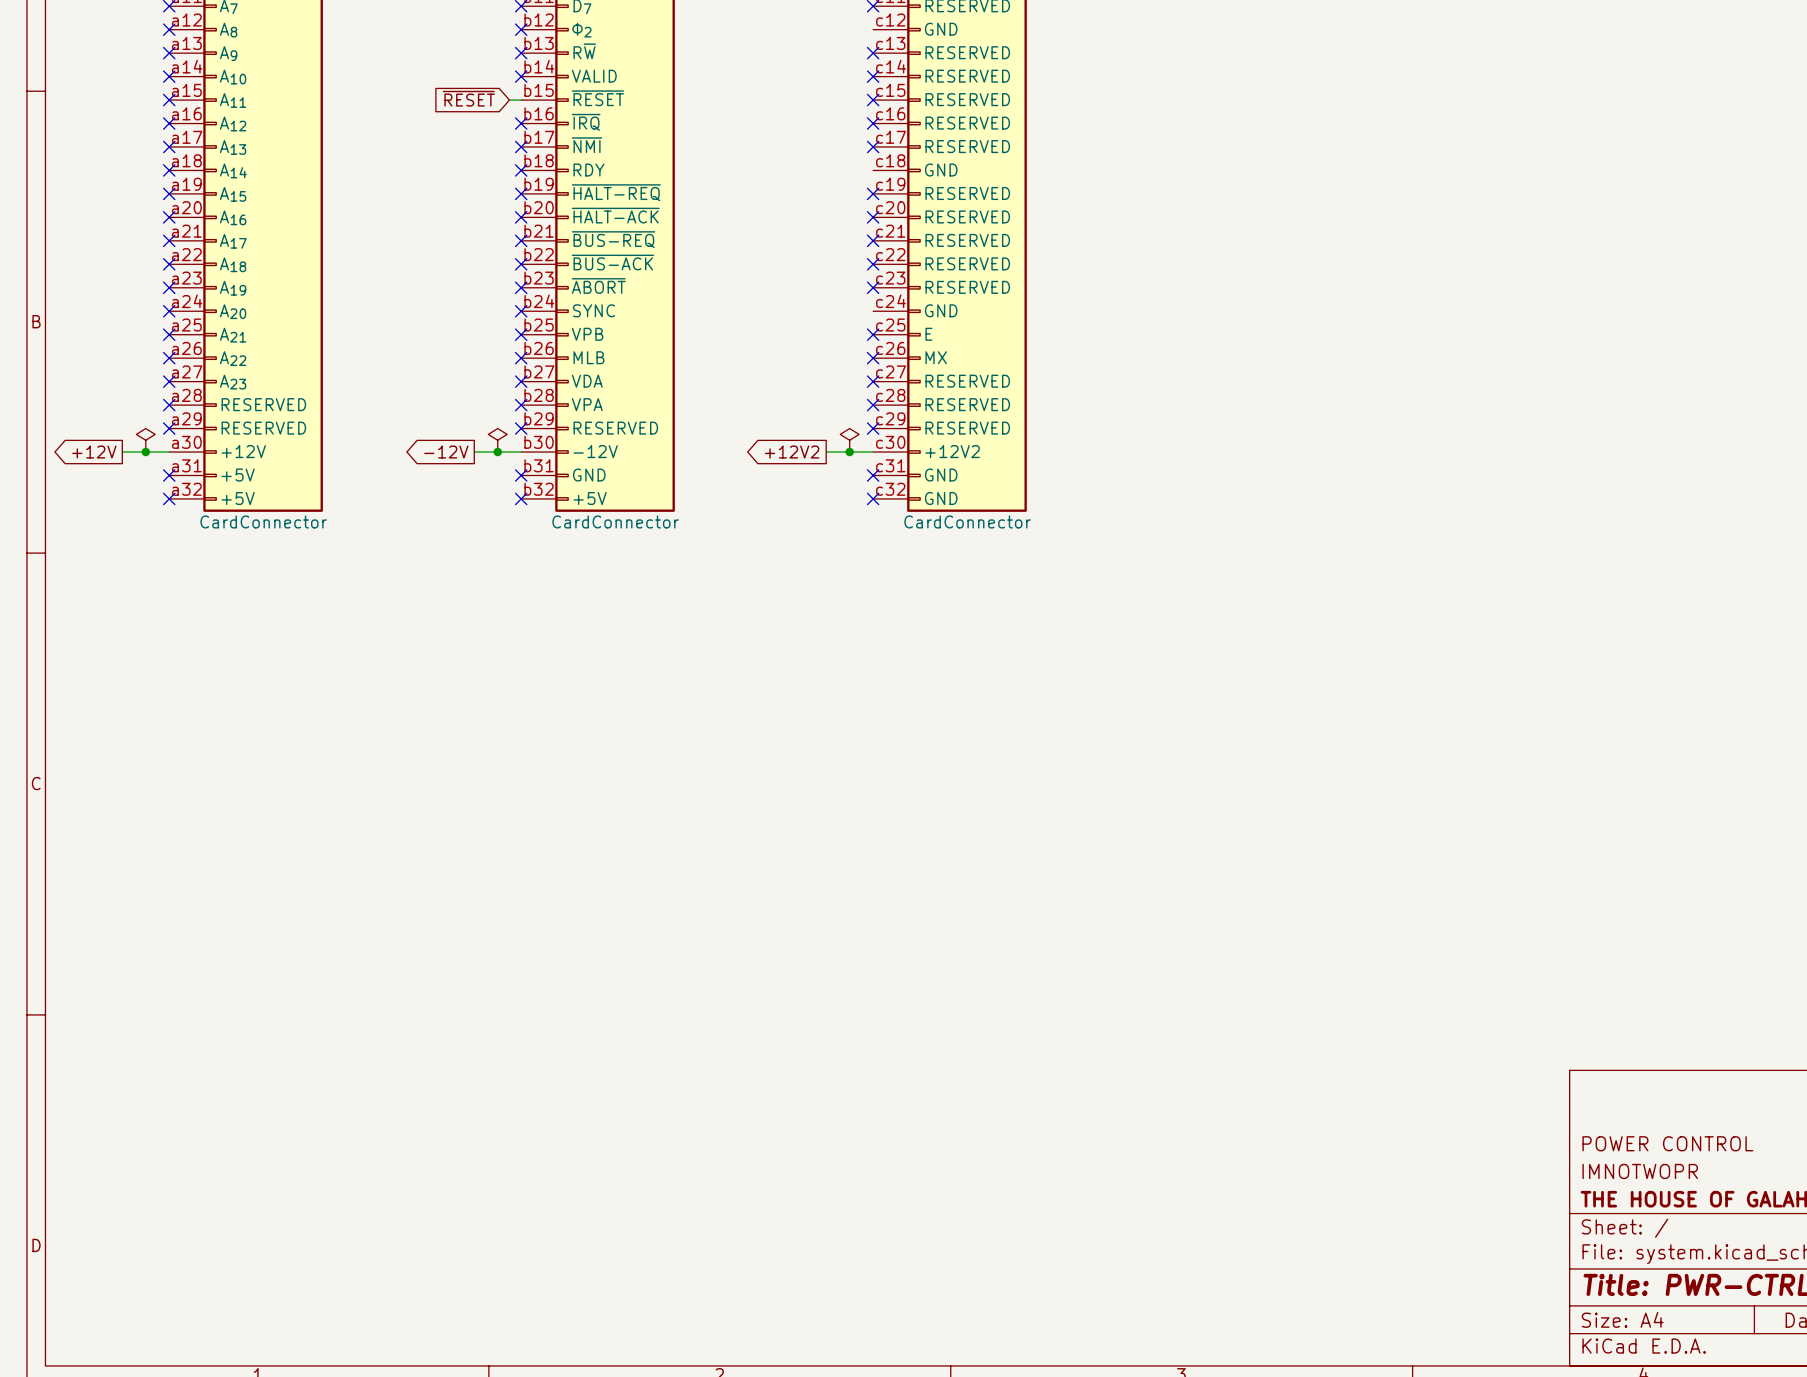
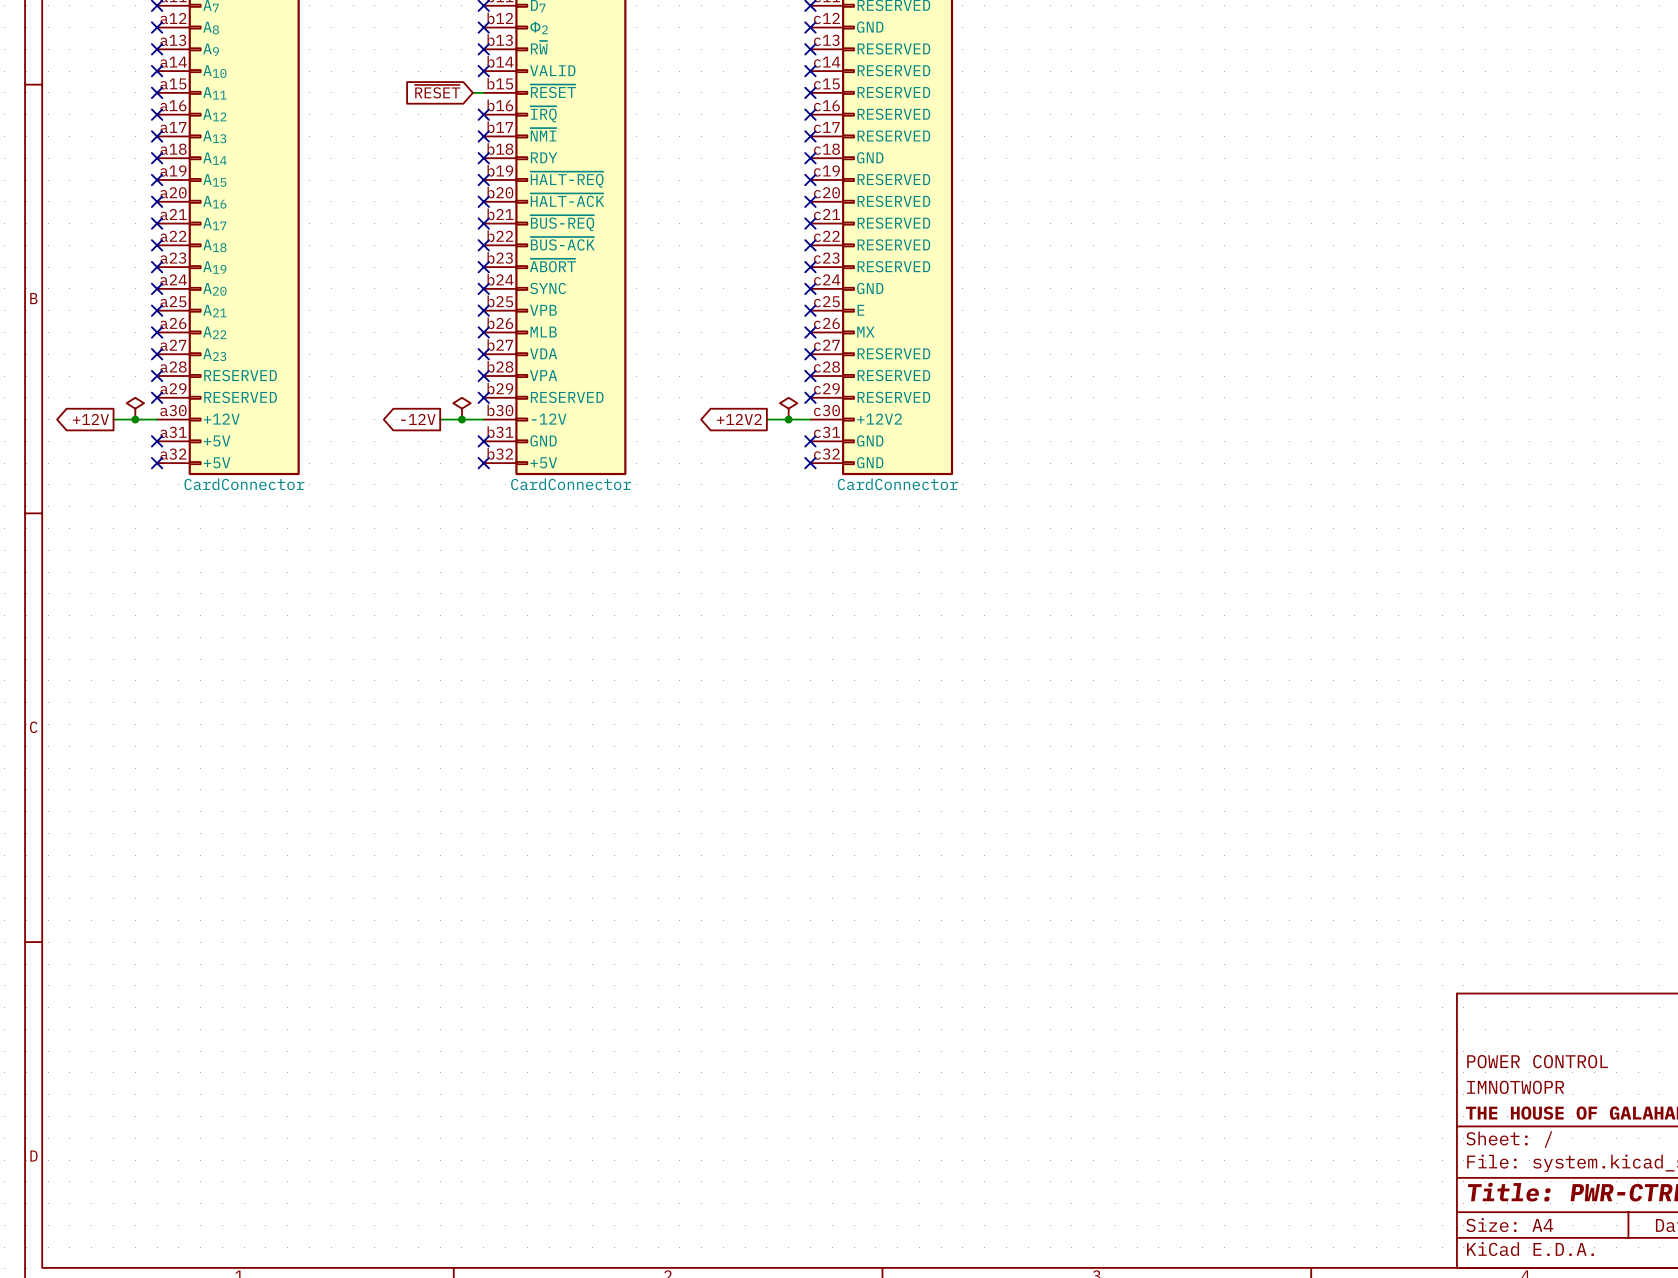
no-connect mark: none -> (810, 27)
no-connect mark: none -> (810, 158)
no-connect mark: none -> (810, 288)

